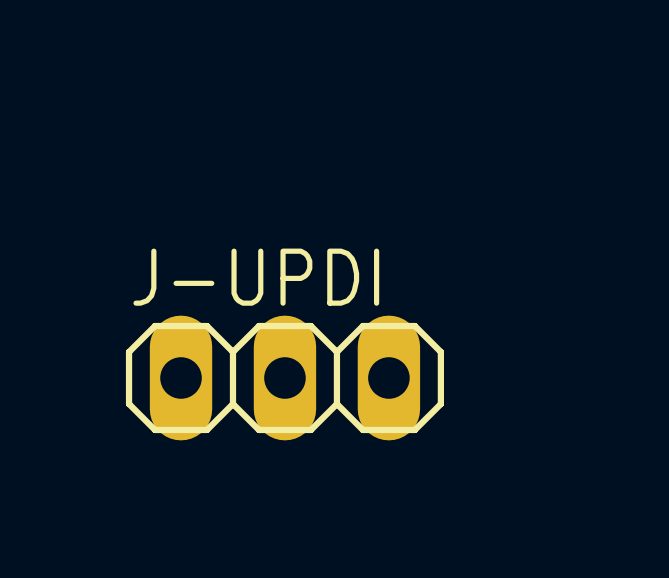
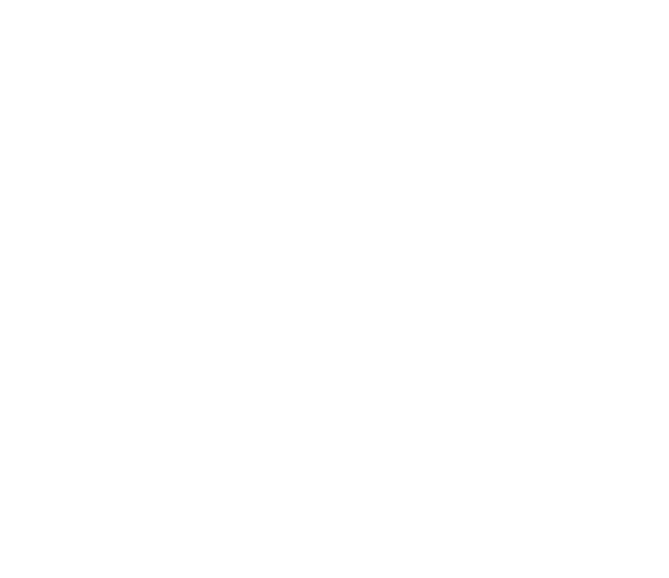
J-UPDI: (284, 378) -> none

